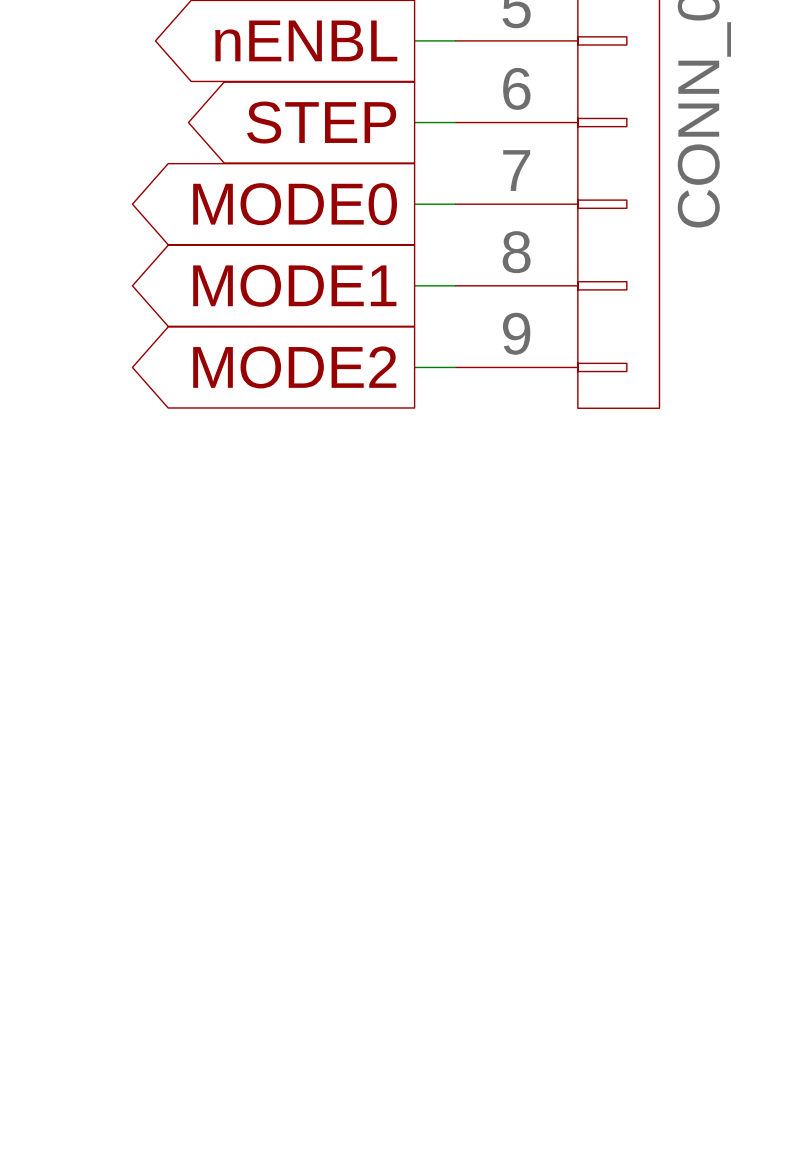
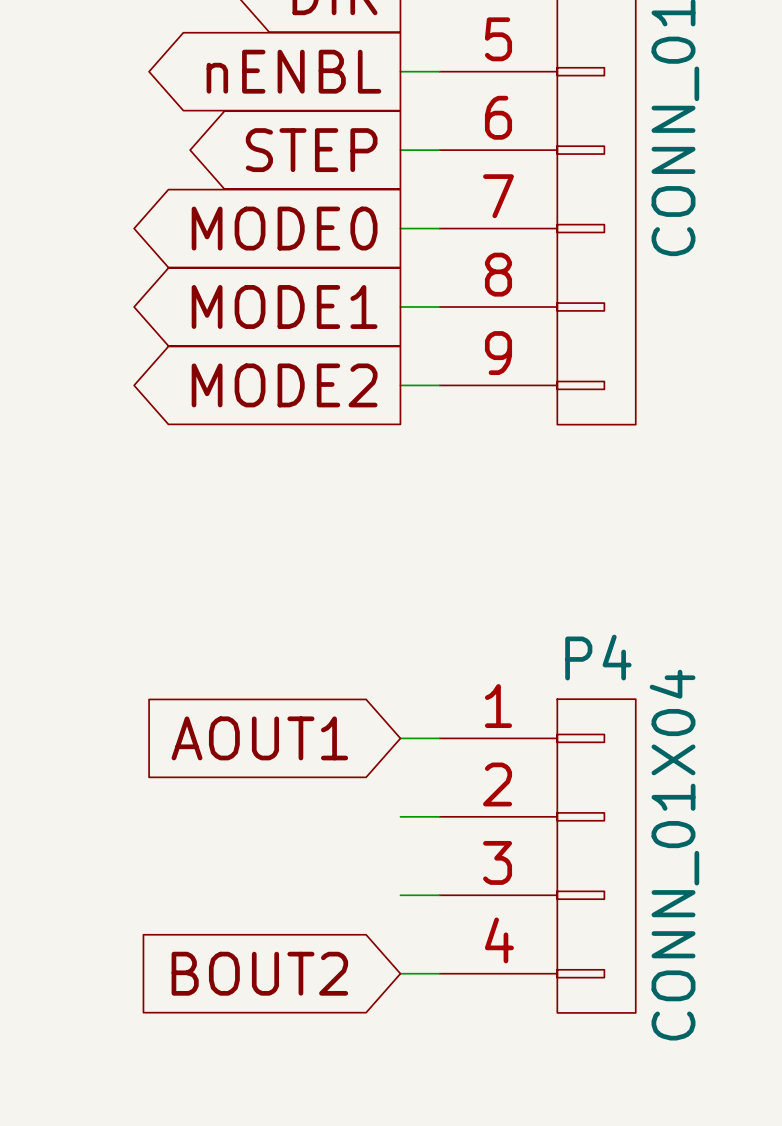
global label: none -> AOUT1 (259, 738)
wire: none -> (400, 738) (439, 738)
wire: none -> (400, 816) (439, 816)
P4: none -> CONN_01X04 (537, 856)
wire: none -> (400, 895) (439, 895)
global label: none -> BOUT2 (259, 973)
wire: none -> (400, 973) (439, 973)

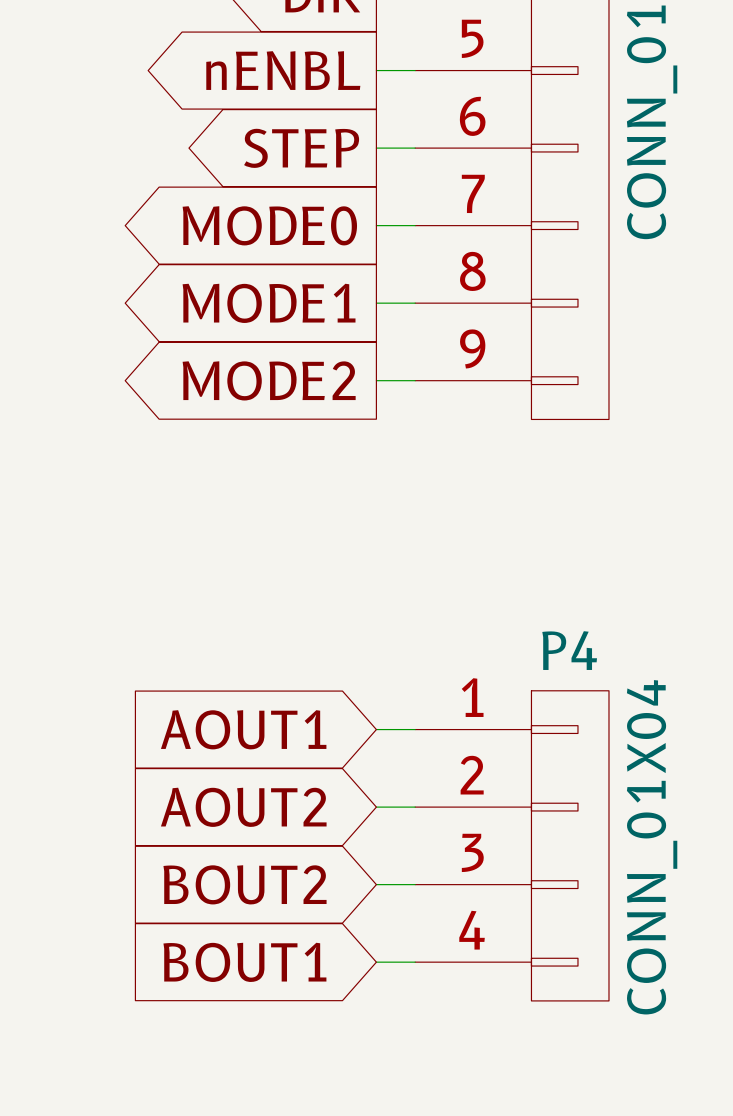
global label: none -> AOUT2 (243, 807)
global label: none -> BOUT2 (245, 884)
global label: BOUT2 (259, 973) -> BOUT1 (244, 962)

